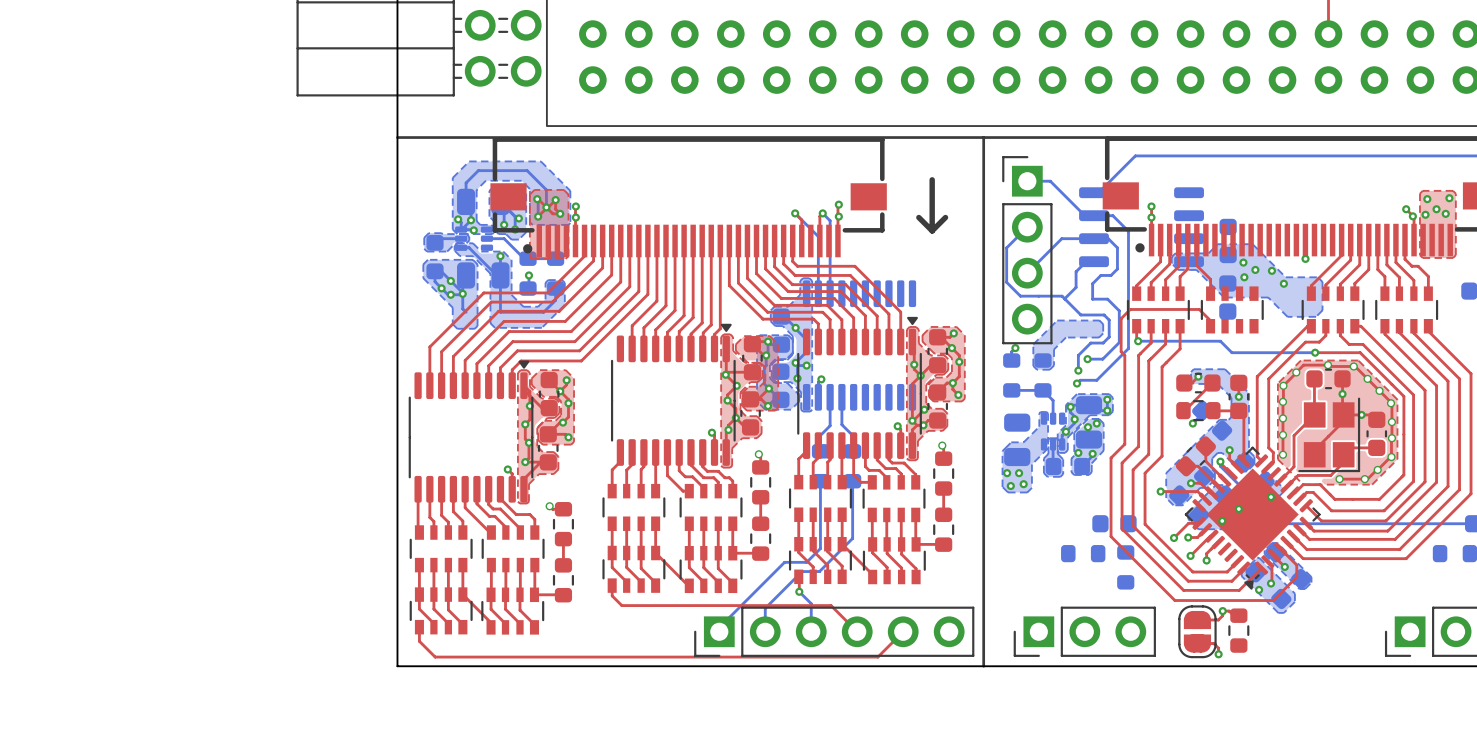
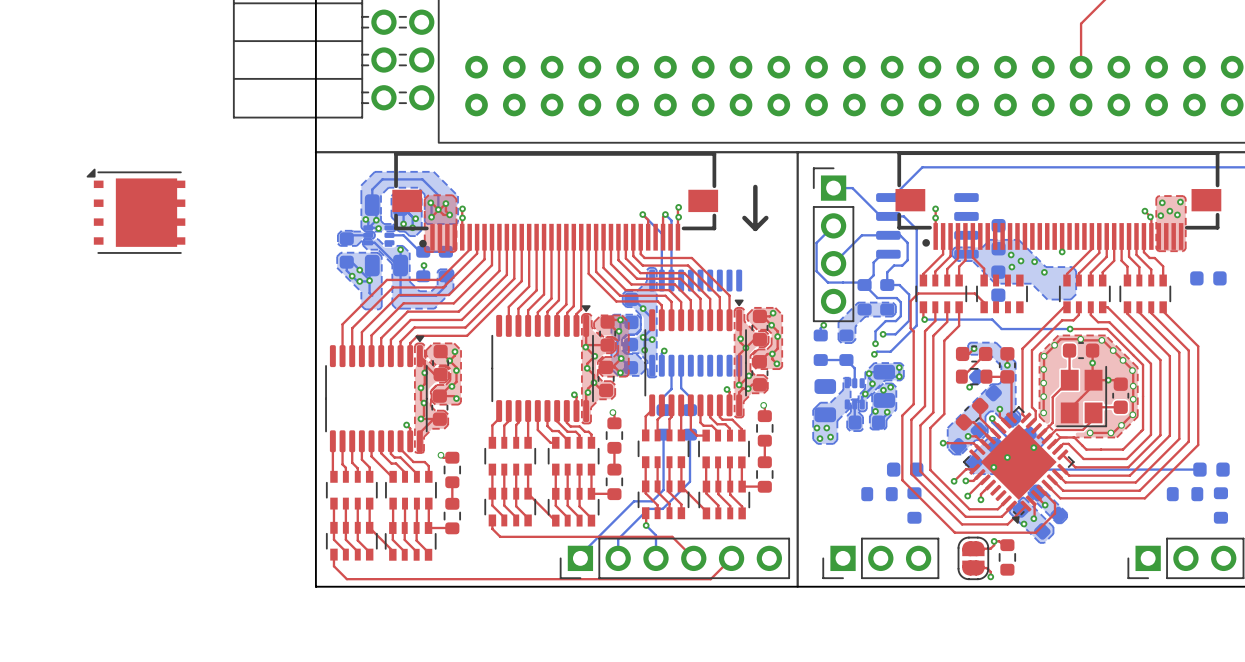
part: none -> (135, 211)
part: none -> (864, 297)
part: none -> (887, 297)

